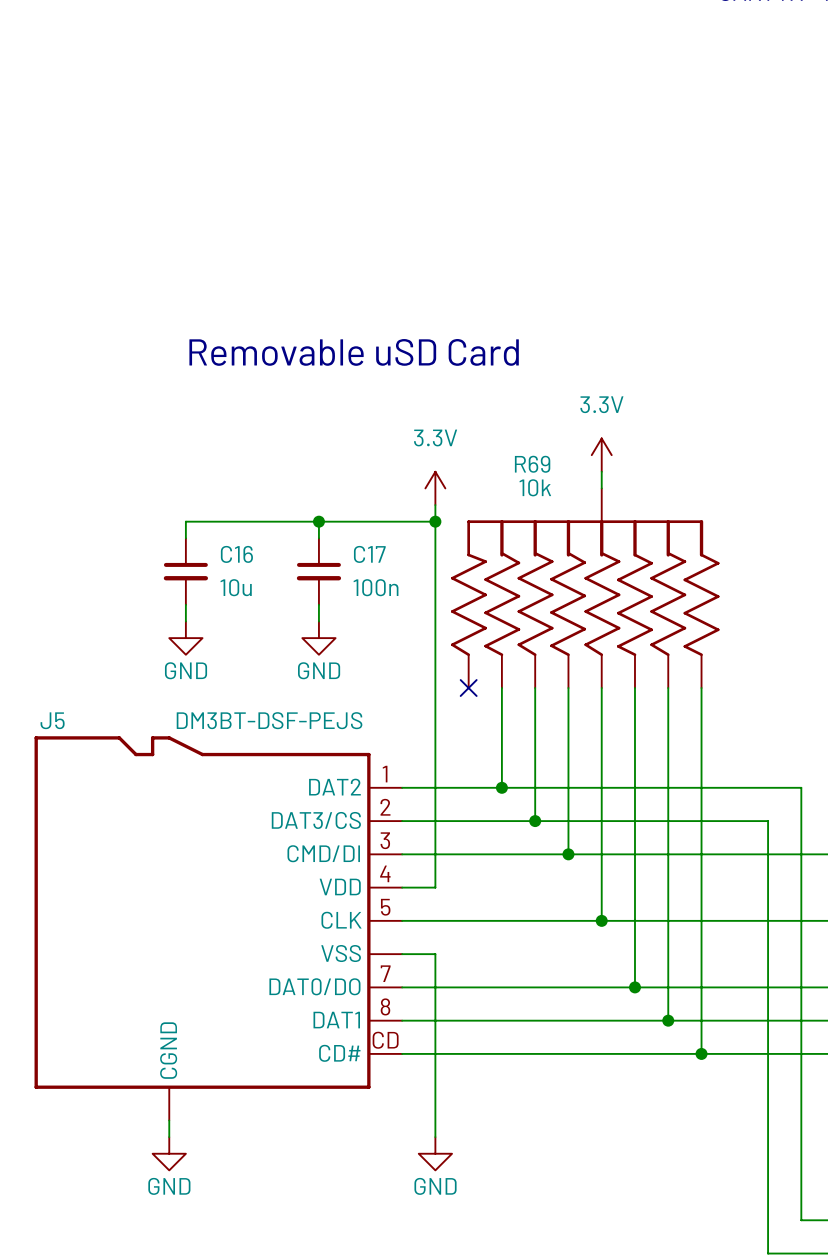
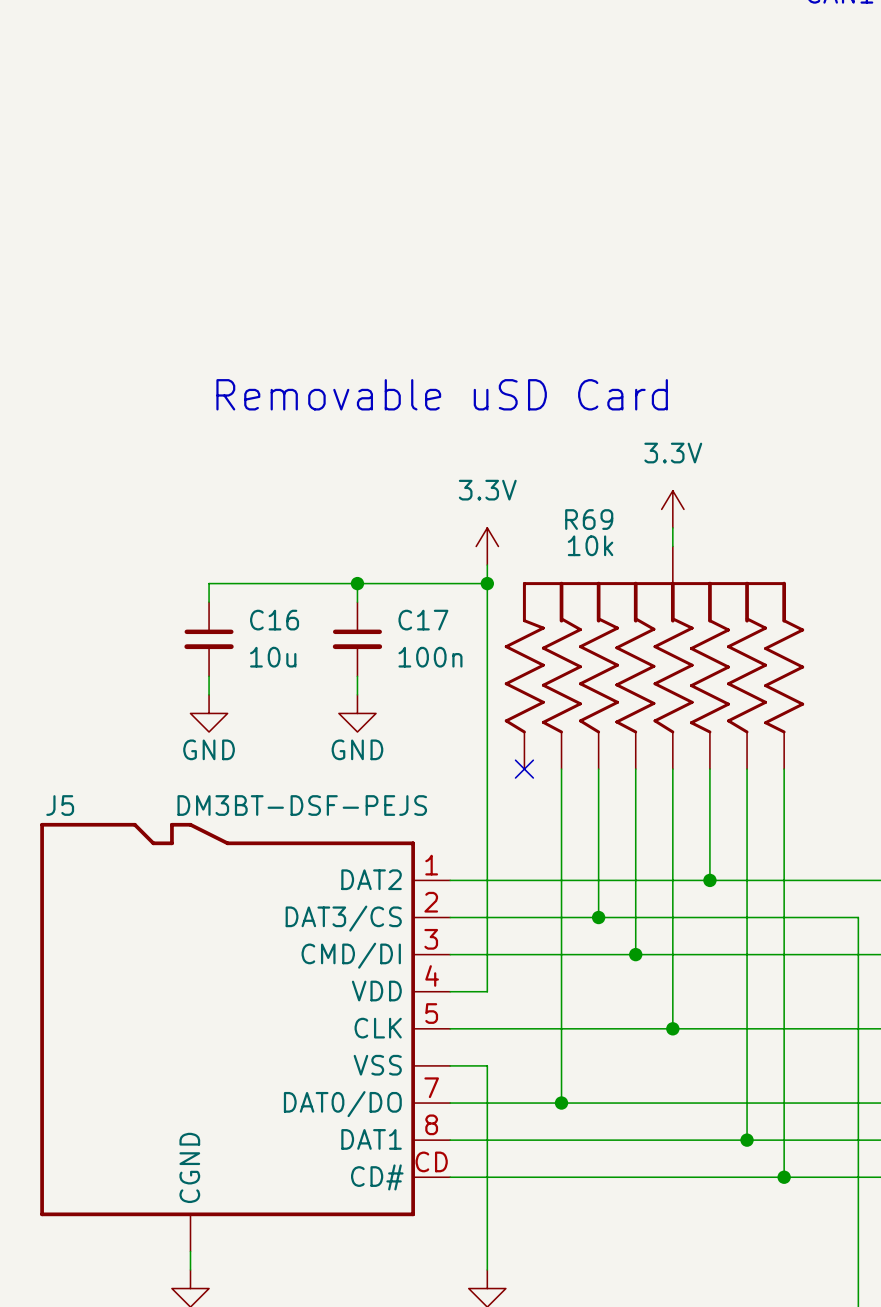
junction: (501, 787) -> none
wire: (634, 787) (634, 987) -> (561, 880) (561, 1103)
junction: none -> (709, 880)
junction: none -> (561, 1103)
junction: (634, 987) -> none

